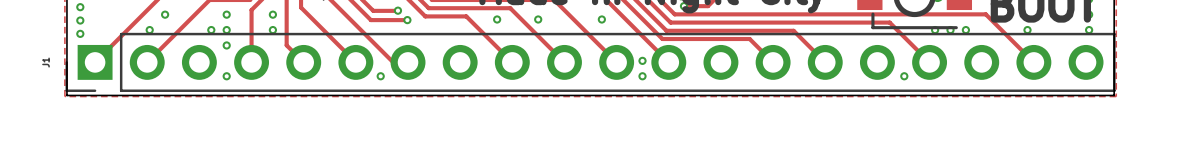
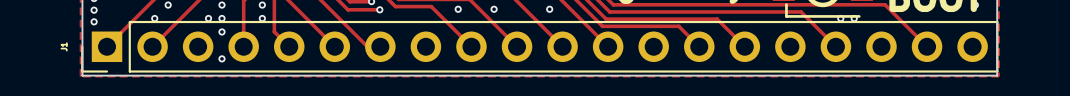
via: (965, 30) -> none
via: (1027, 30) -> none
via: (1089, 30) -> none
via: (642, 60) -> none
via: (380, 76) -> none
via: (642, 76) -> none
via: (904, 76) -> none

